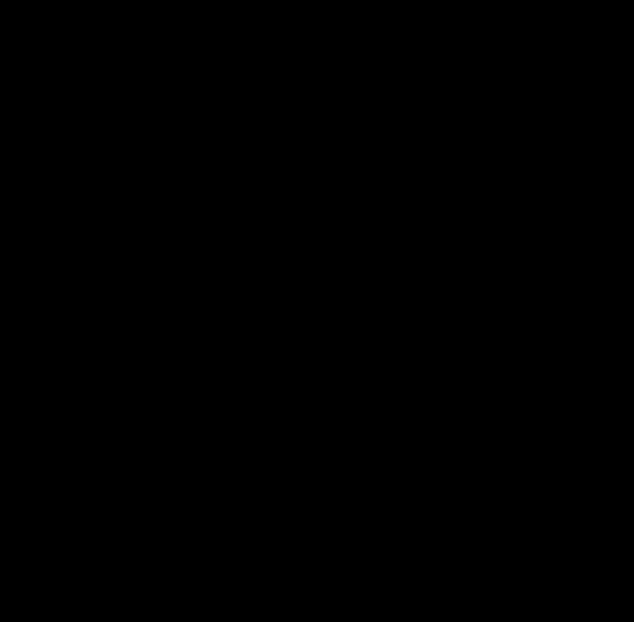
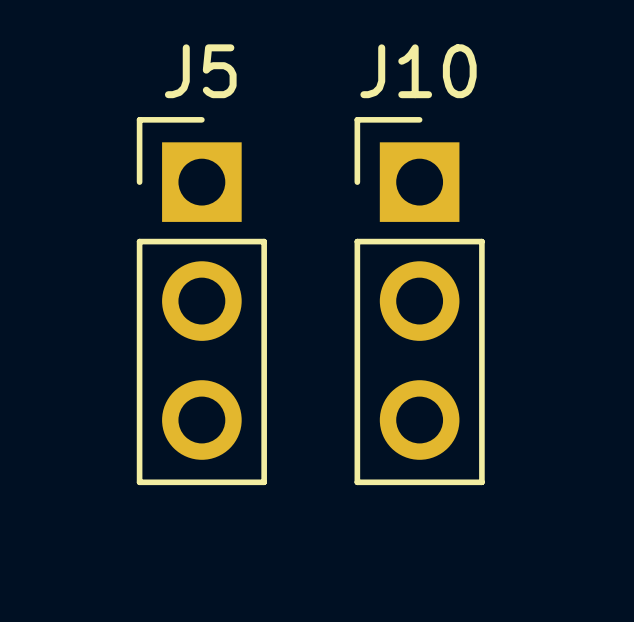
J5: none -> (201, 301)
J10: none -> (419, 301)

